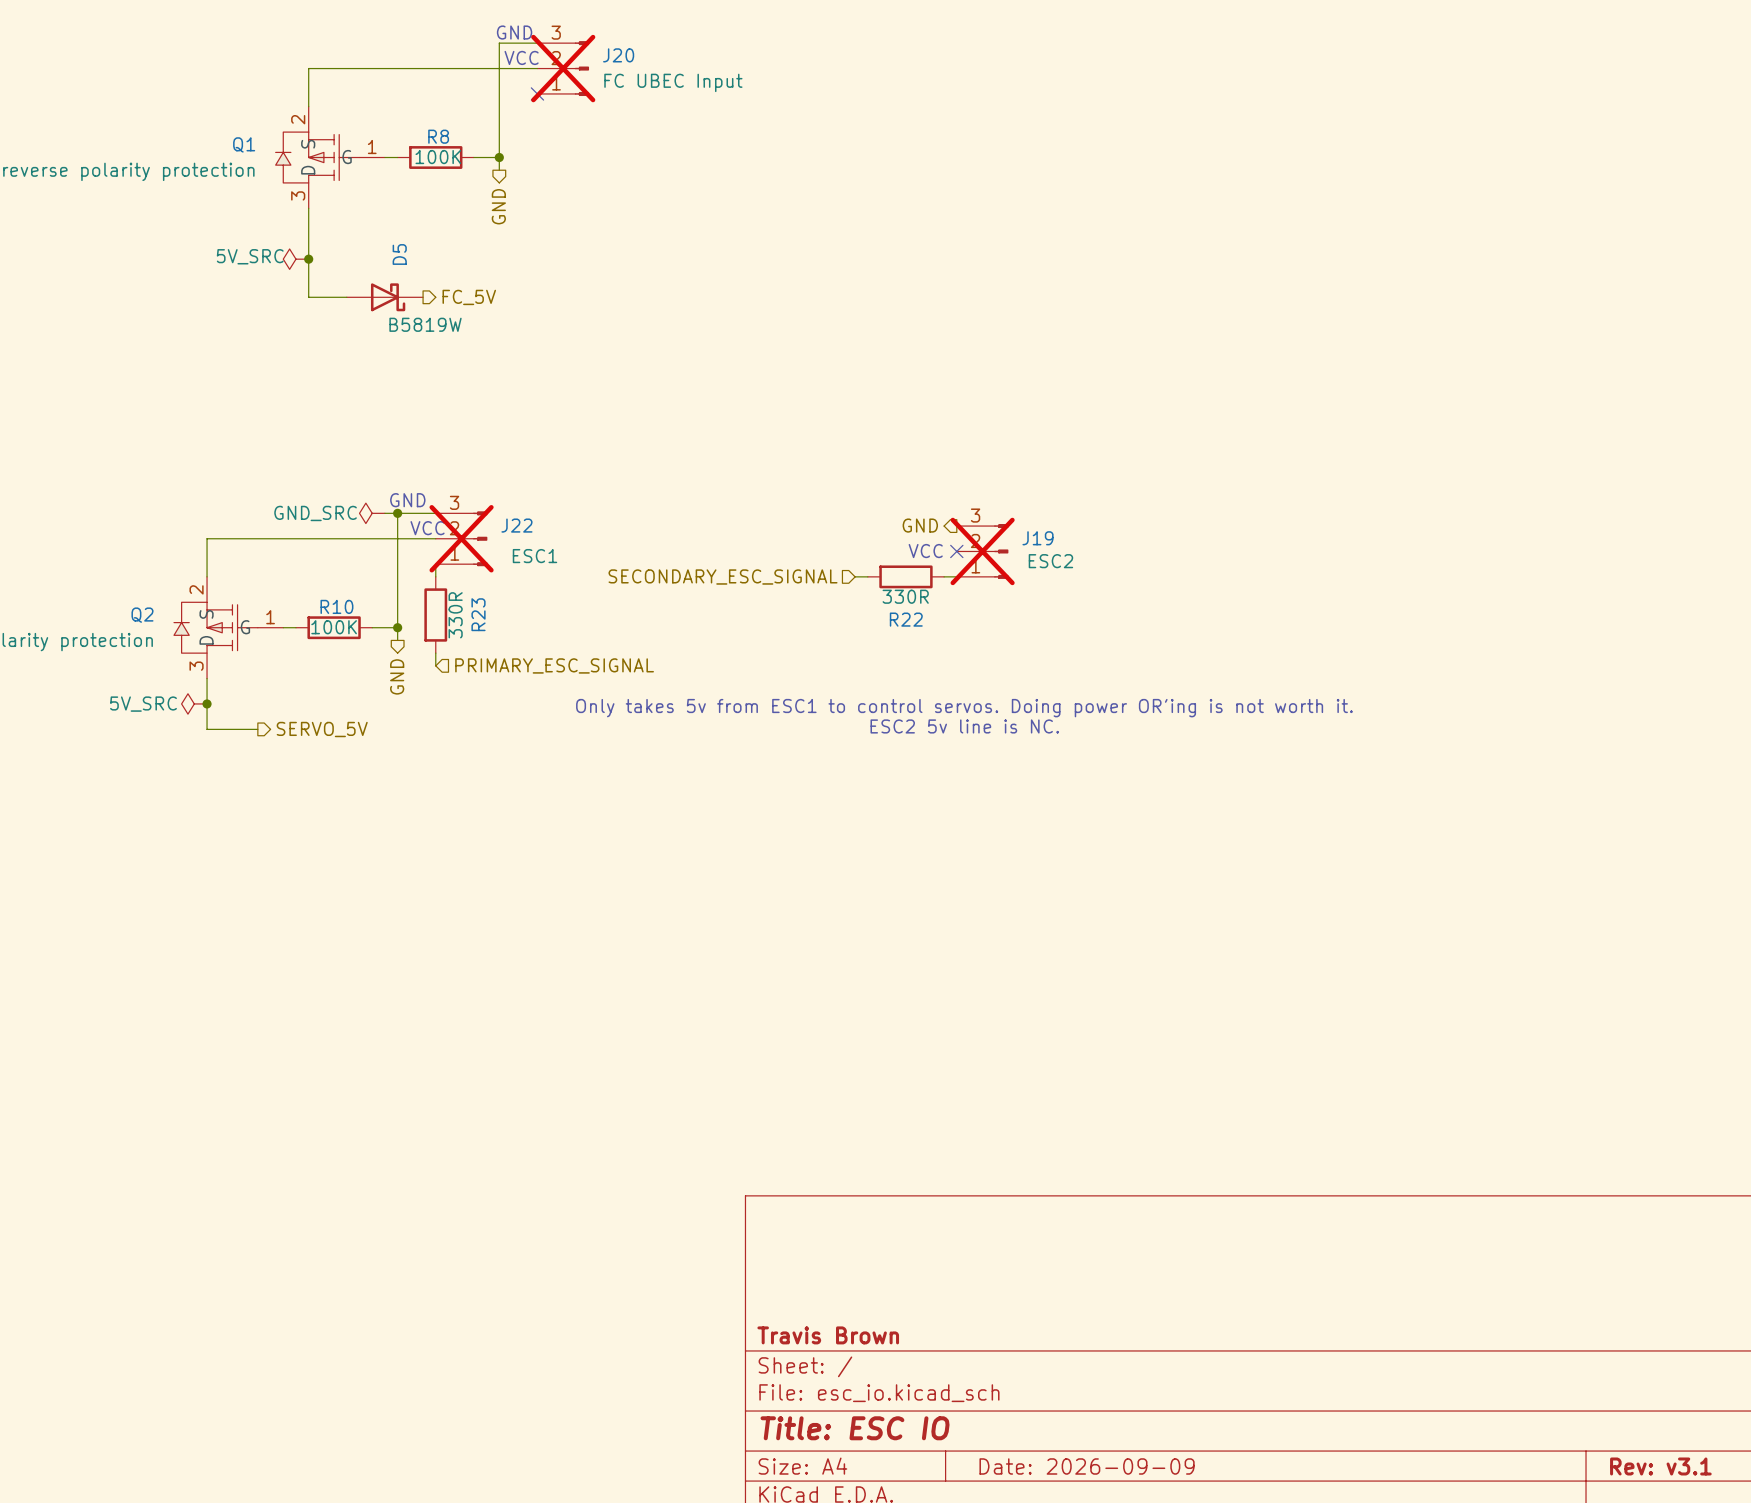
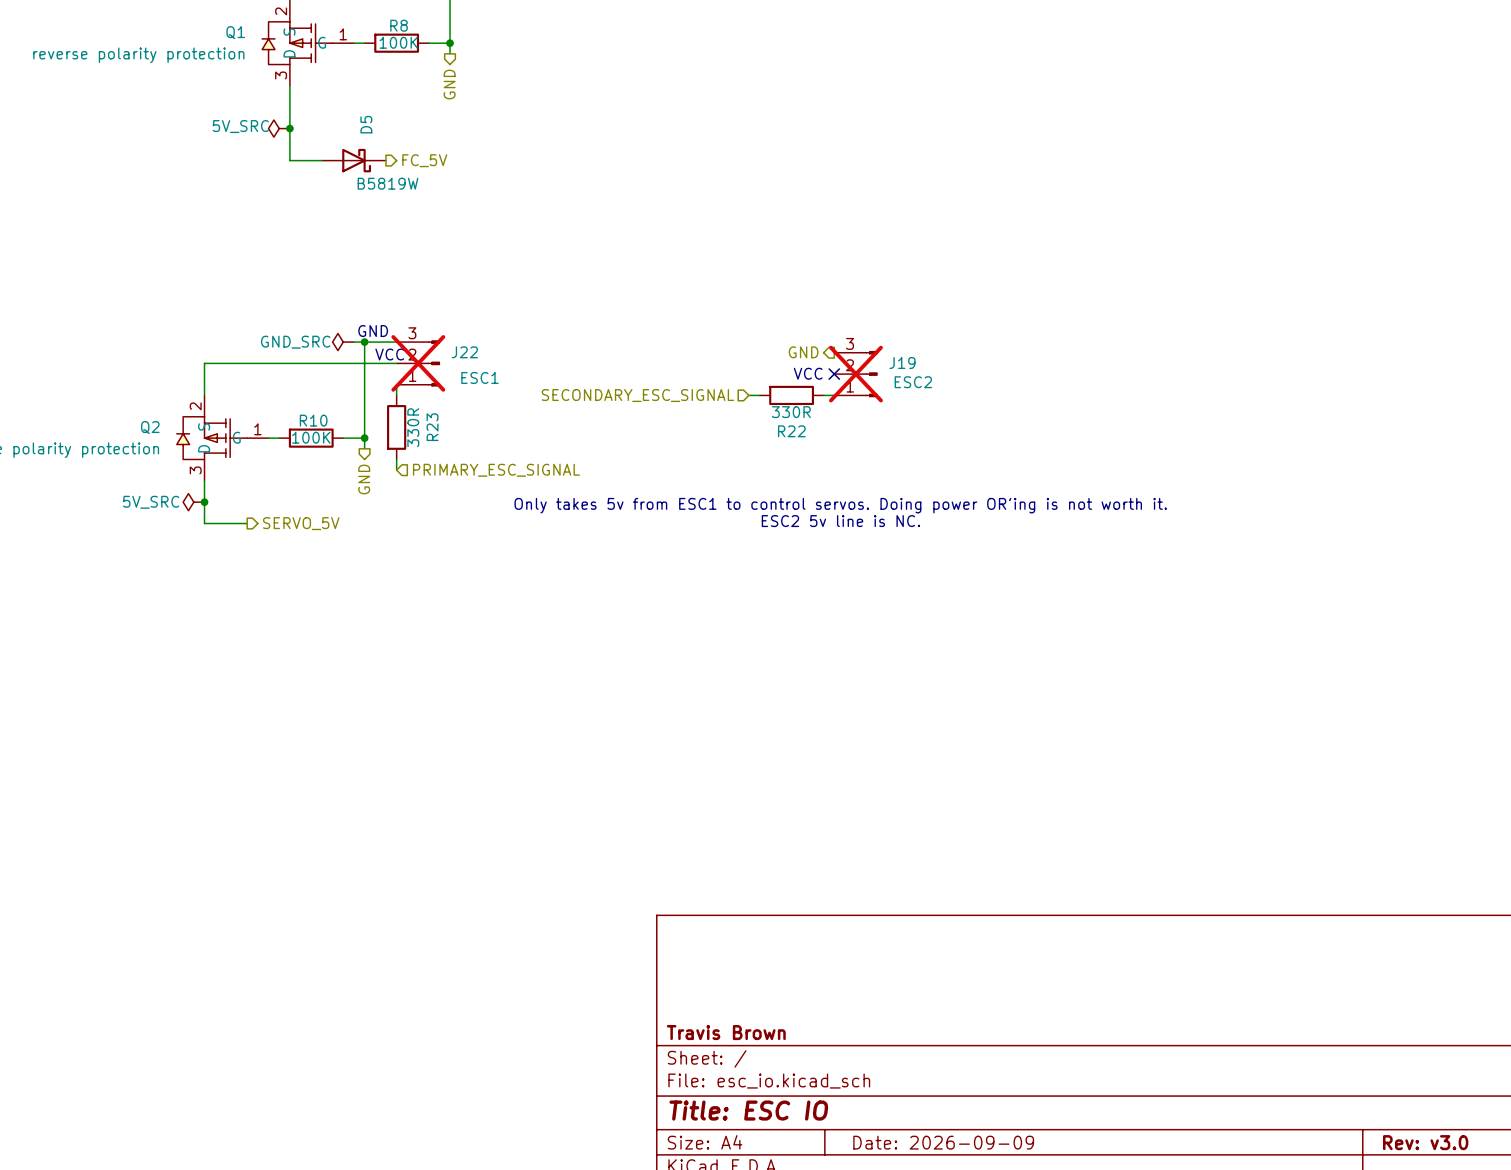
title block: Rev: v3.1 (1660, 1466) -> Rev: v3.0 (1425, 1142)

